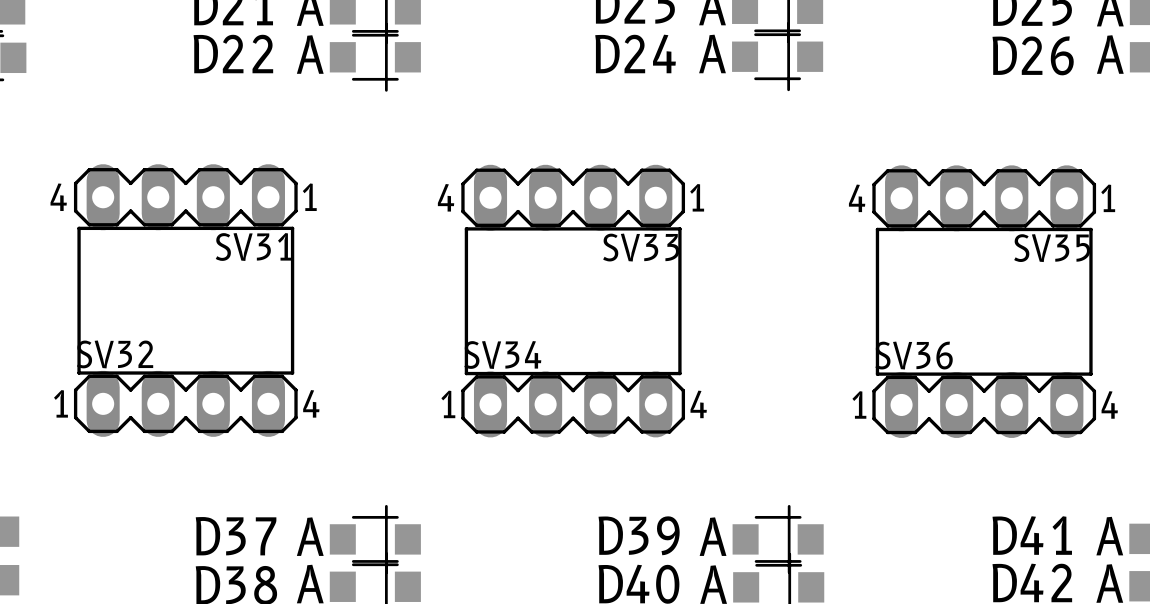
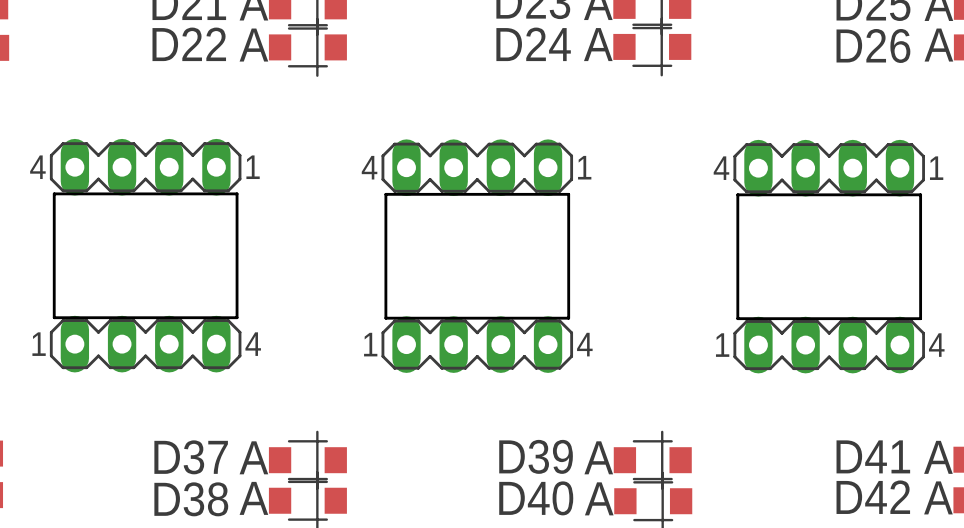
SV31 name: SV31 (253, 247) -> none
SV33 name: SV33 (641, 247) -> none
SV35 name: SV35 (1052, 248) -> none
SV32 name: SV32 (115, 354) -> none
SV34 name: SV34 (502, 355) -> none
SV36 name: SV36 (914, 355) -> none

